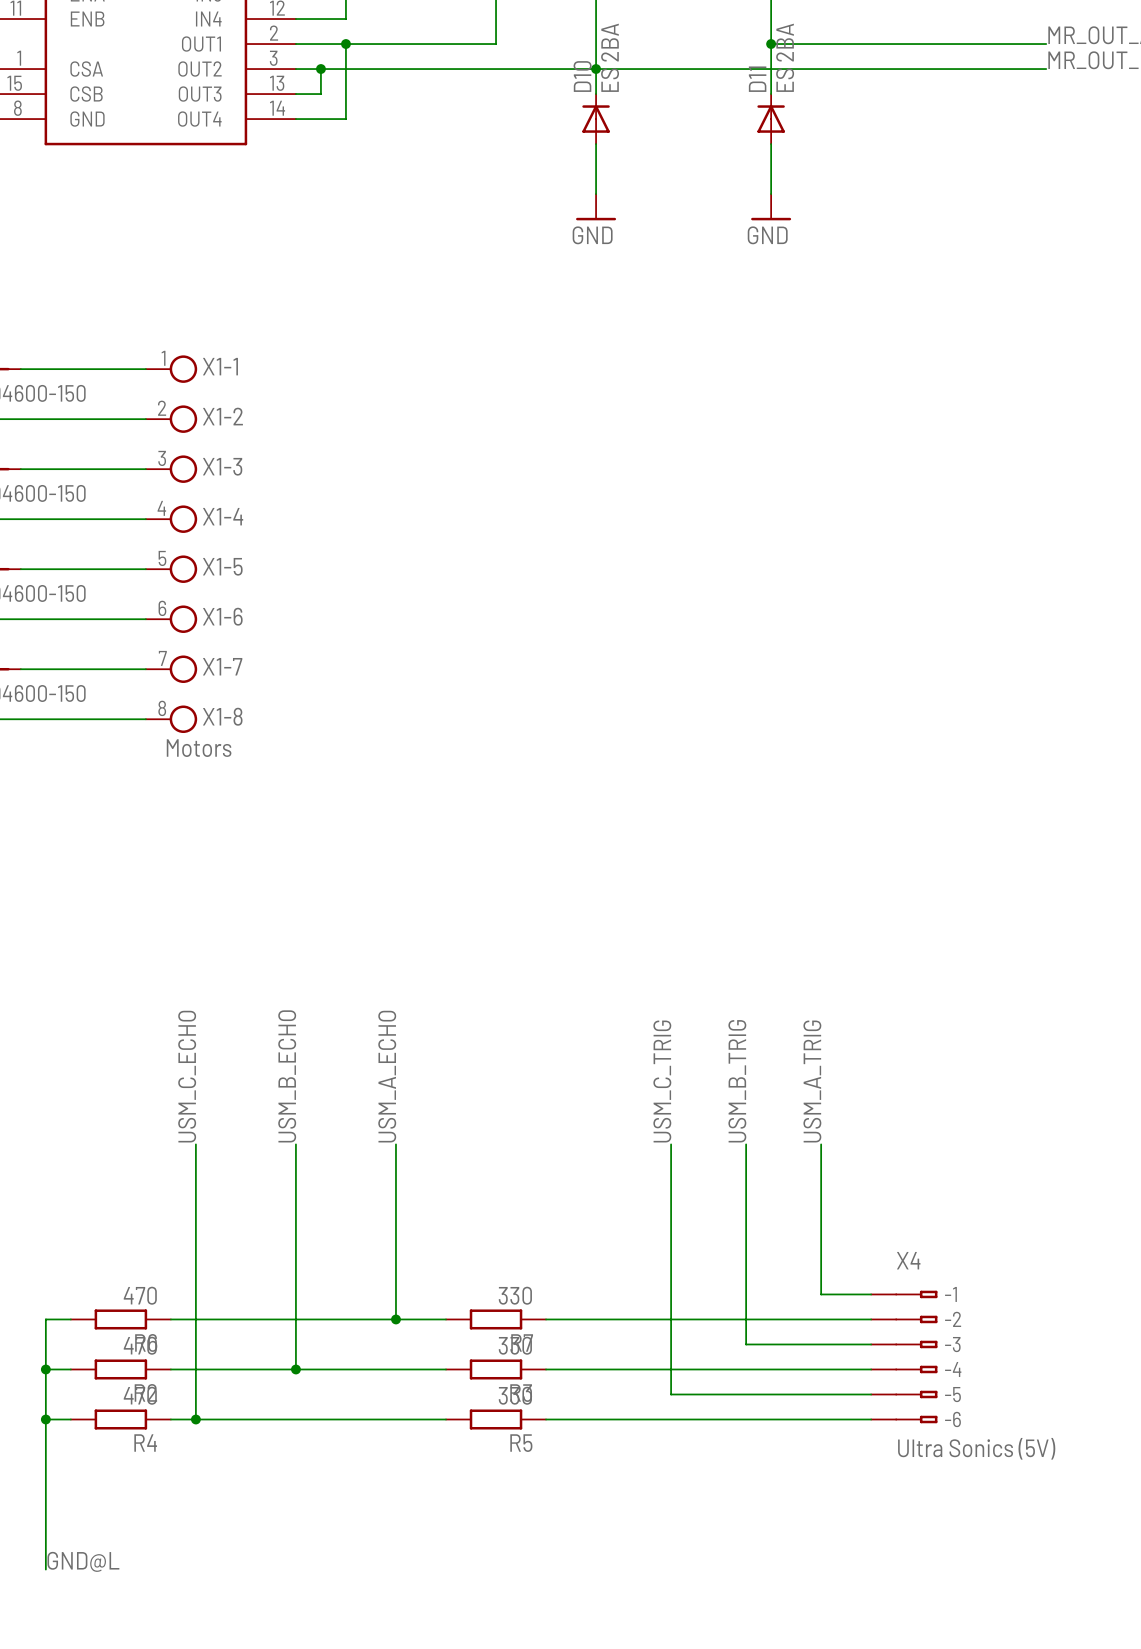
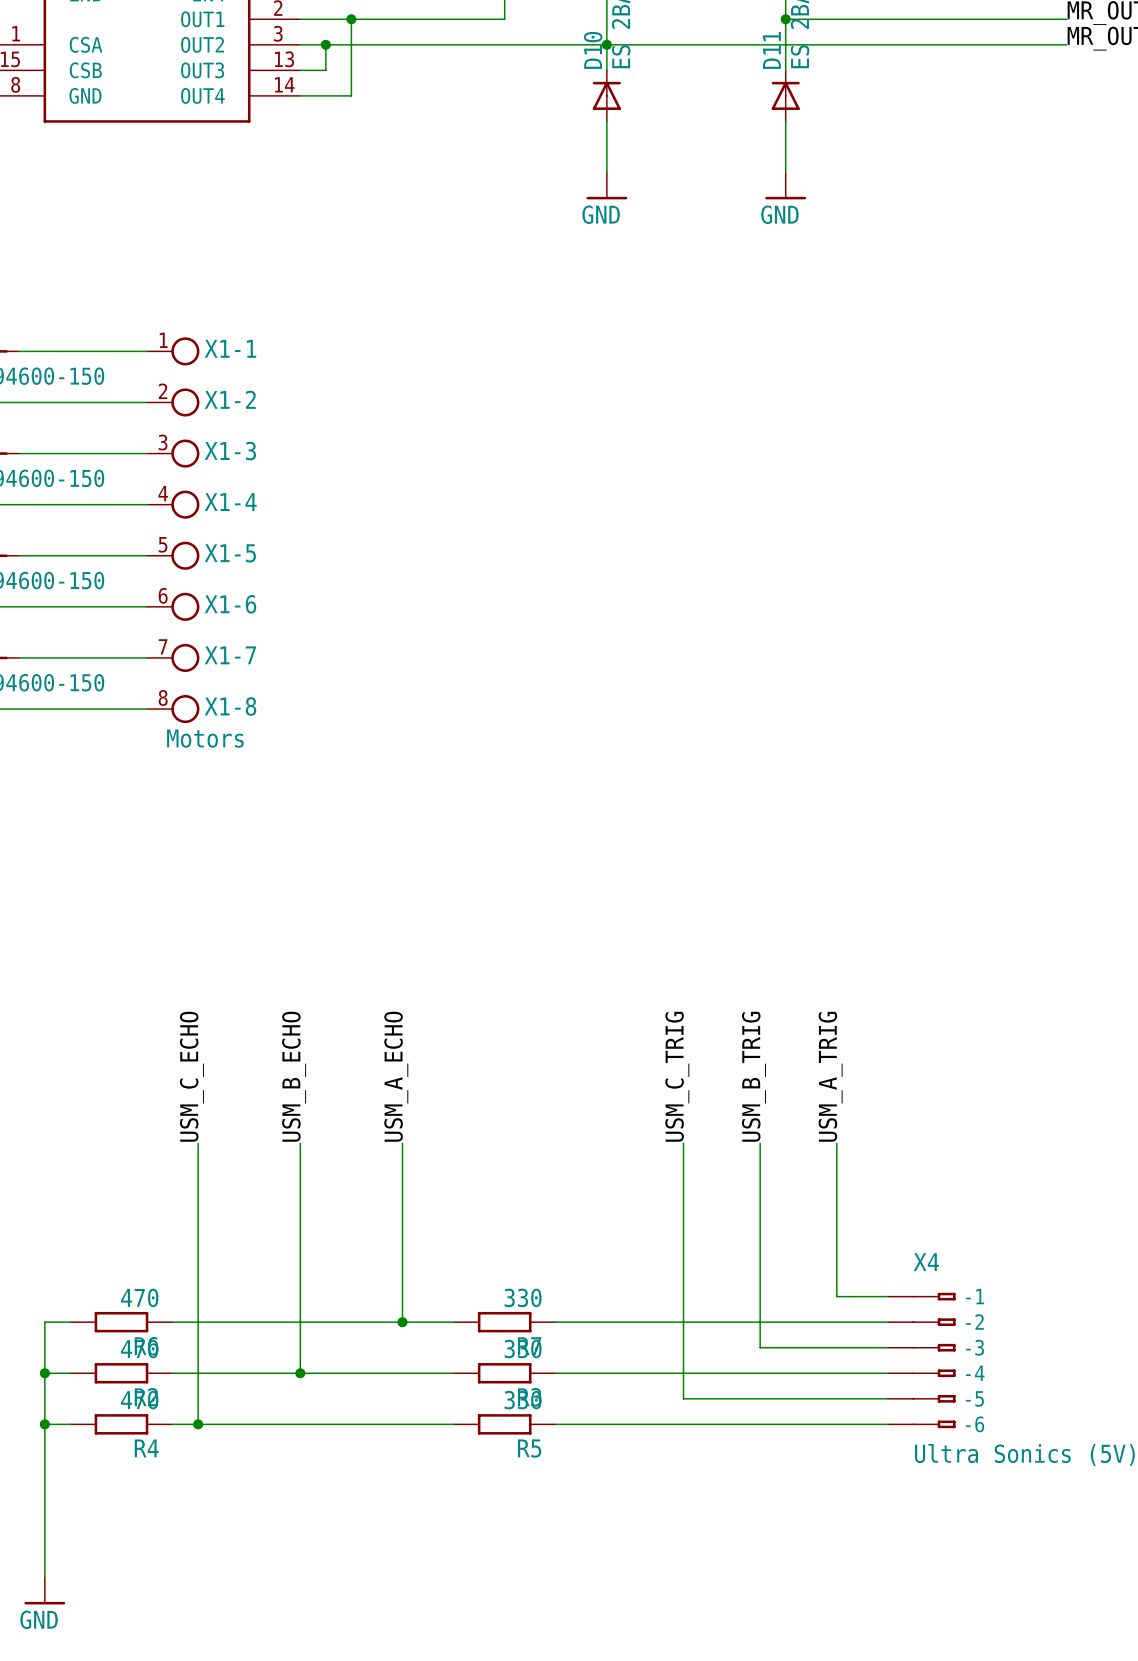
label: GND@L (83, 1561) -> none
power symbol: none -> GND (44, 1591)

